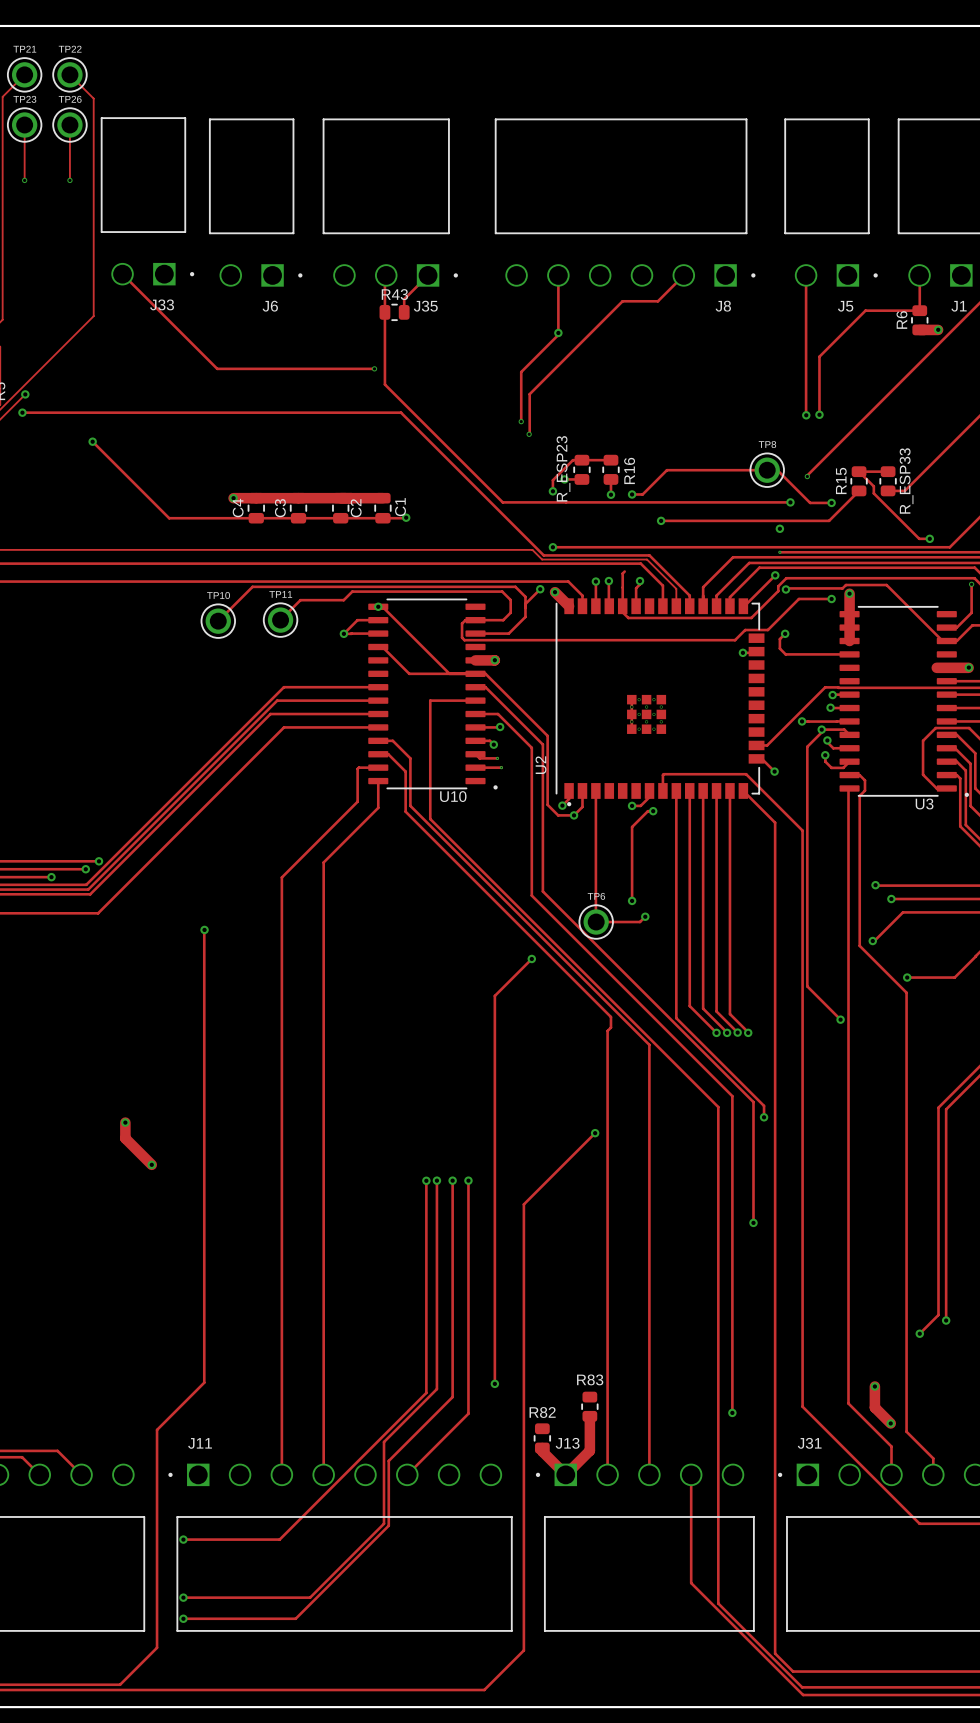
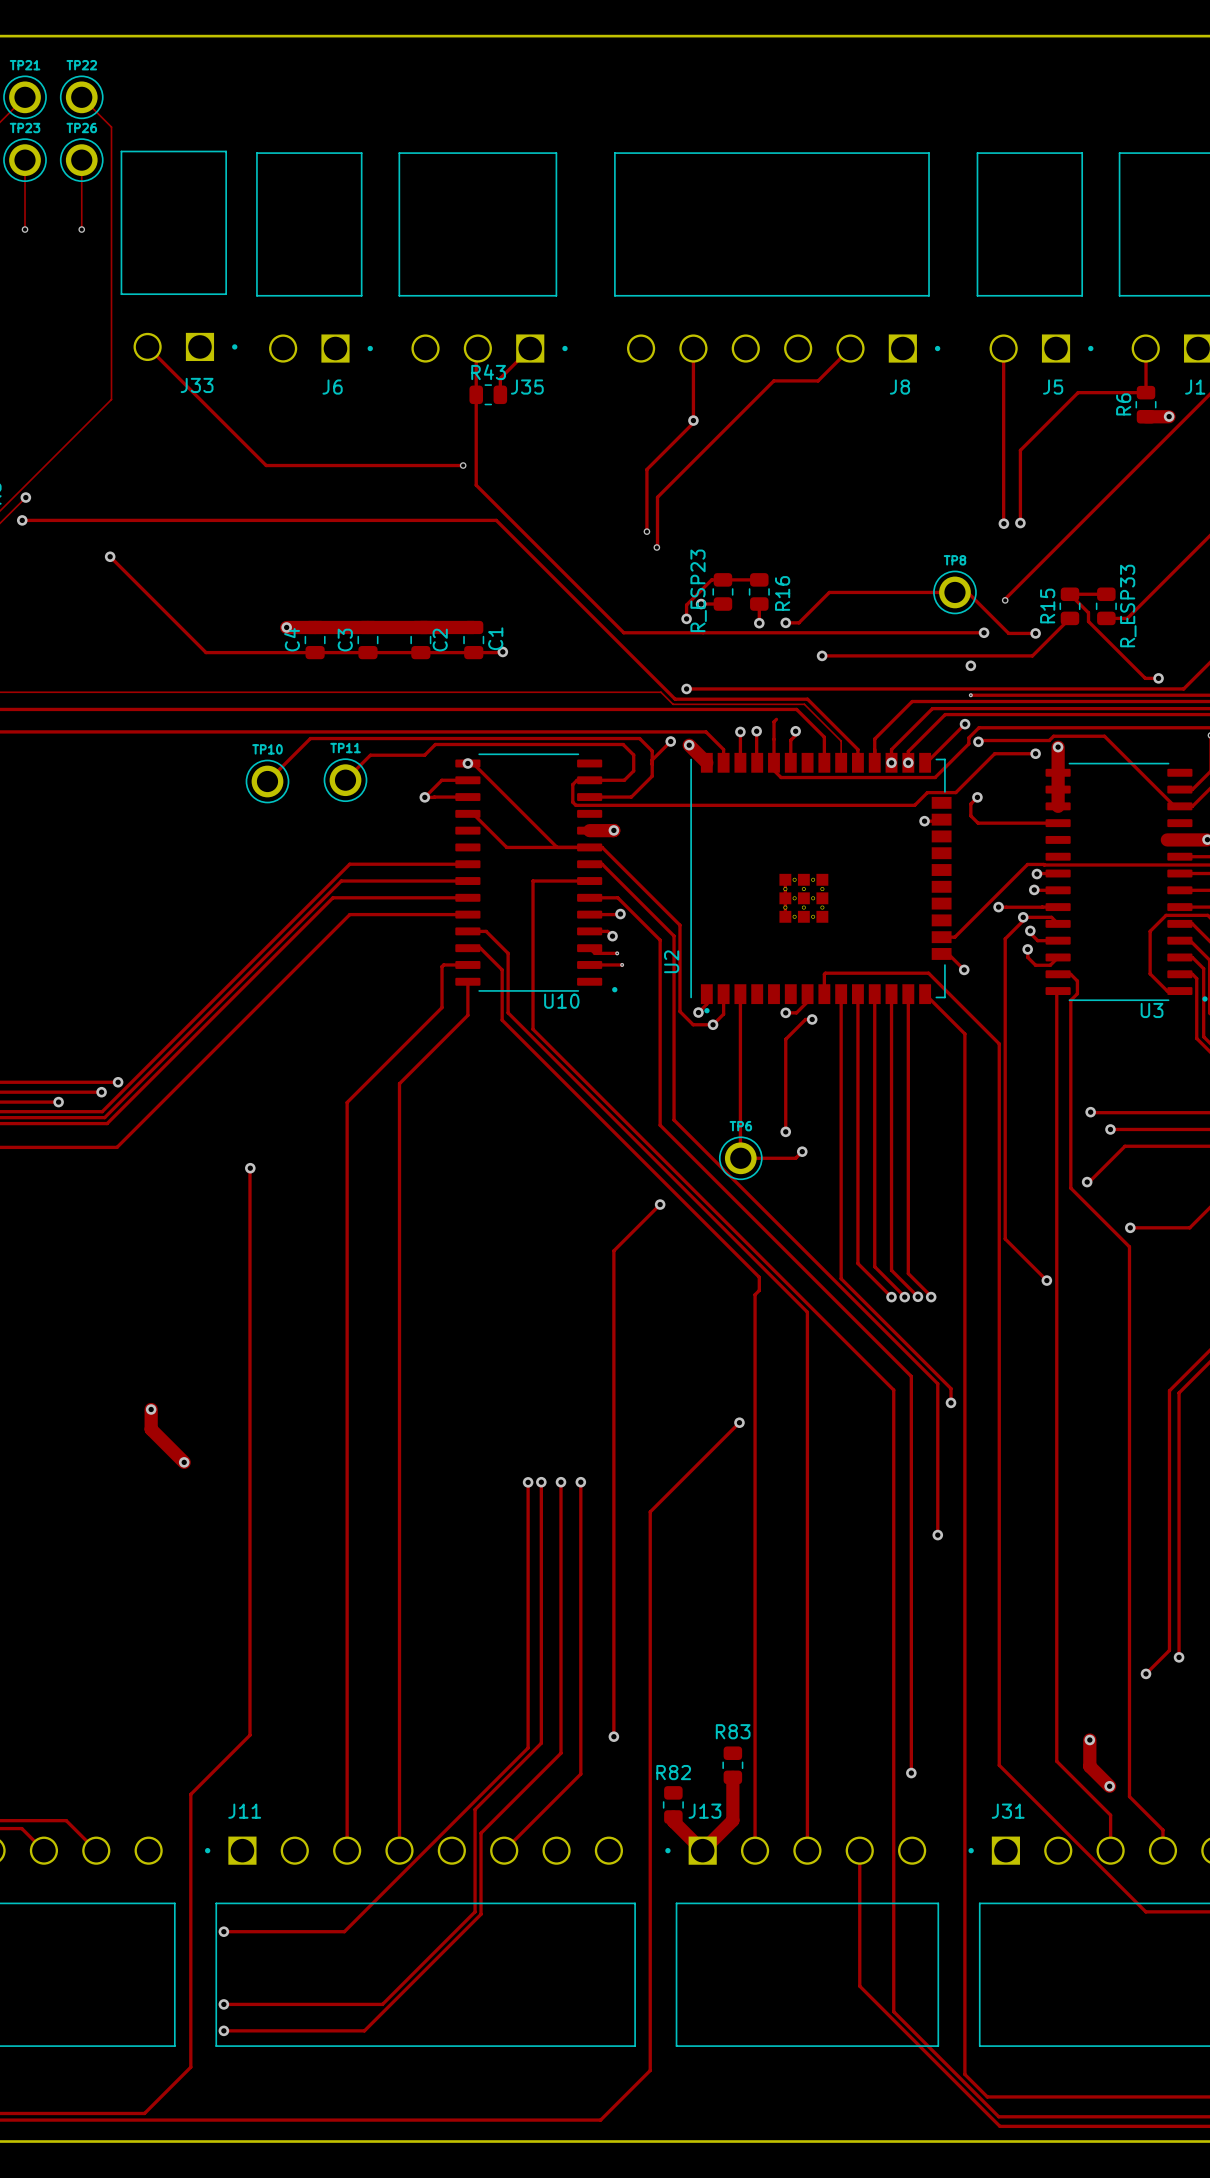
via: none -> (891, 762)
via: none -> (908, 762)

